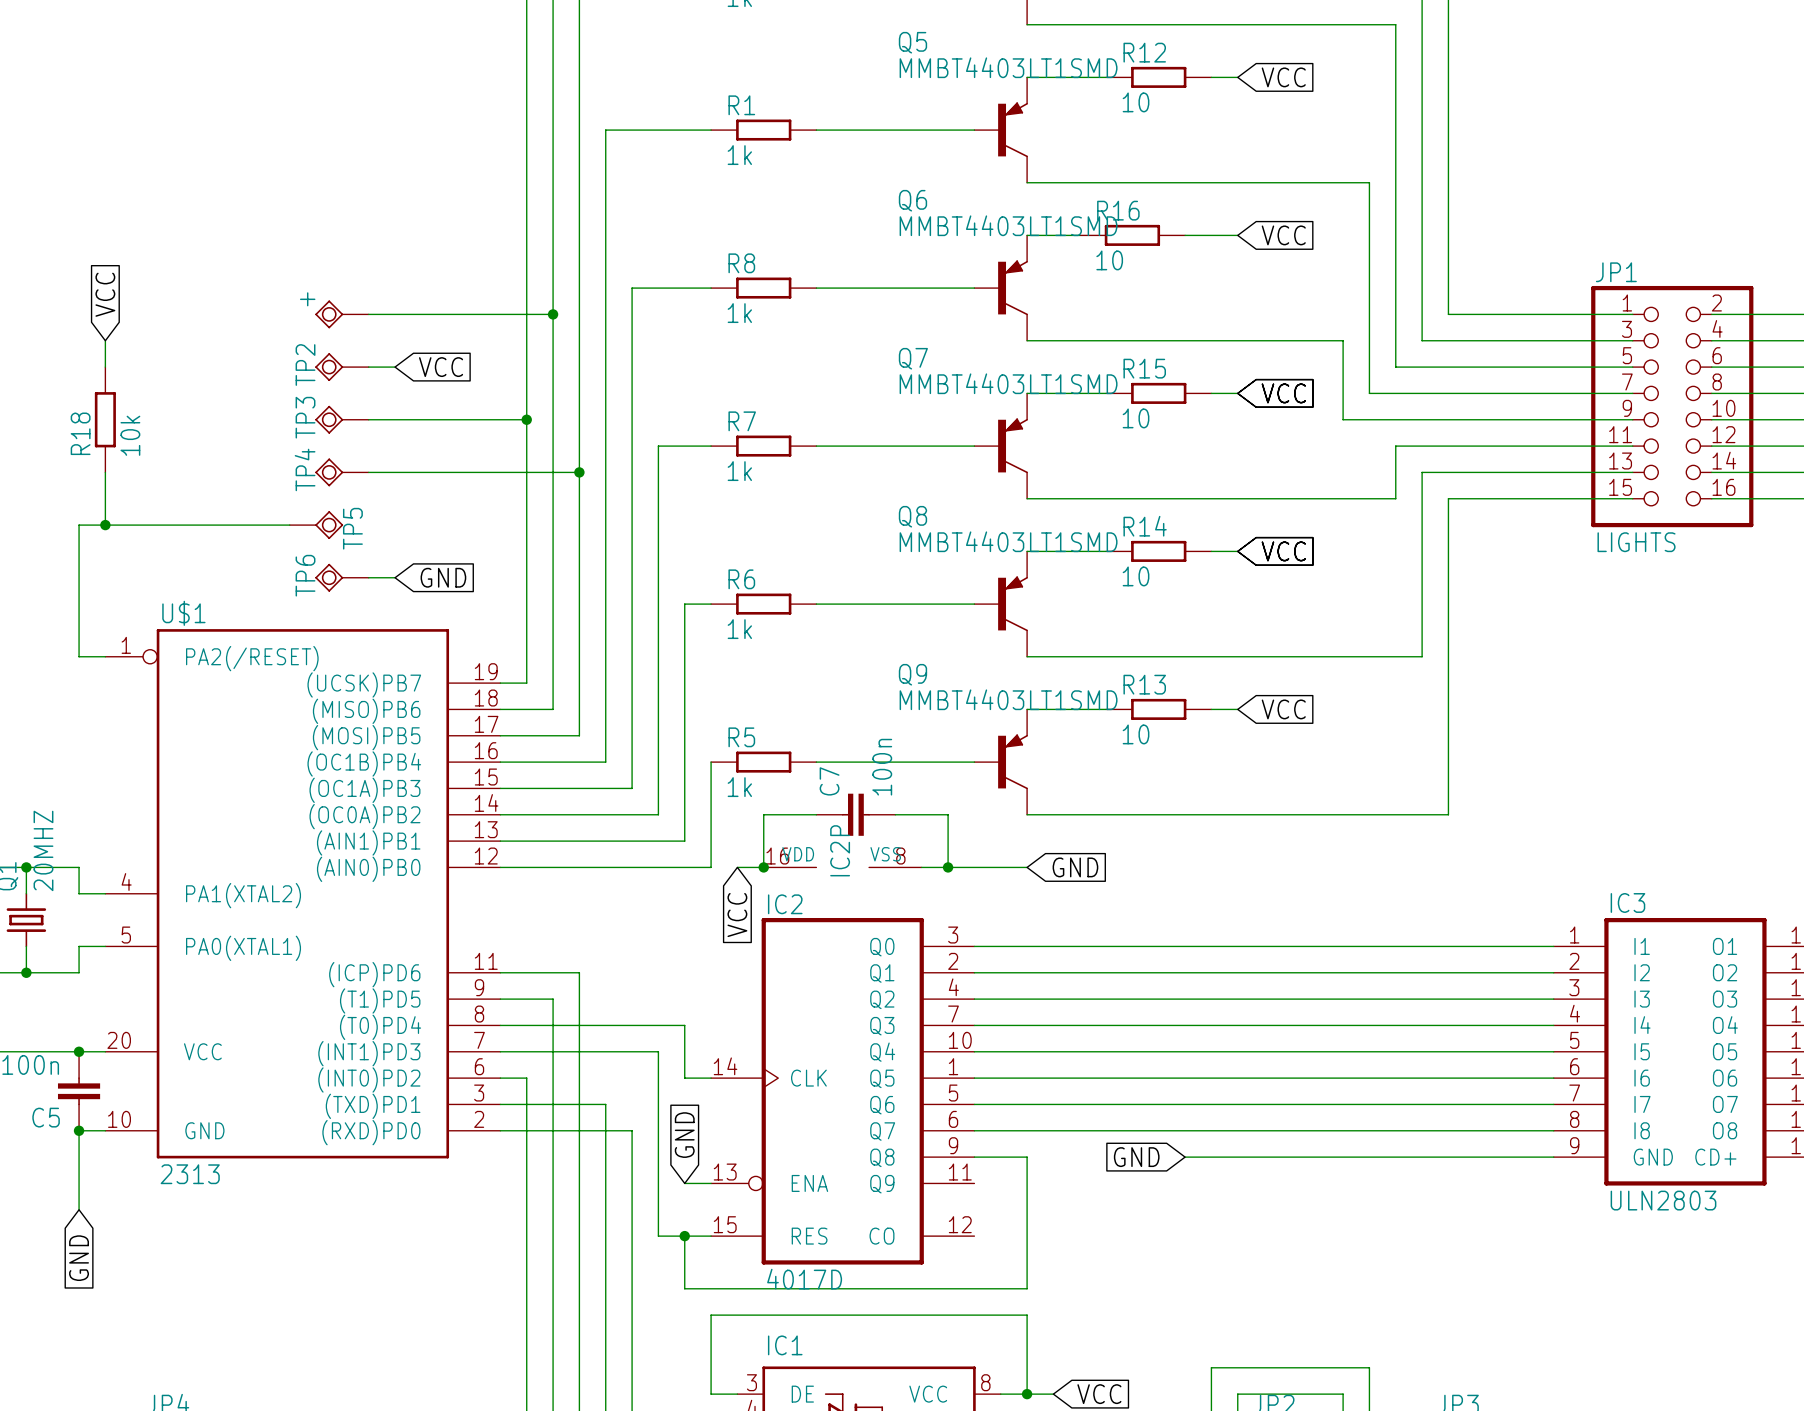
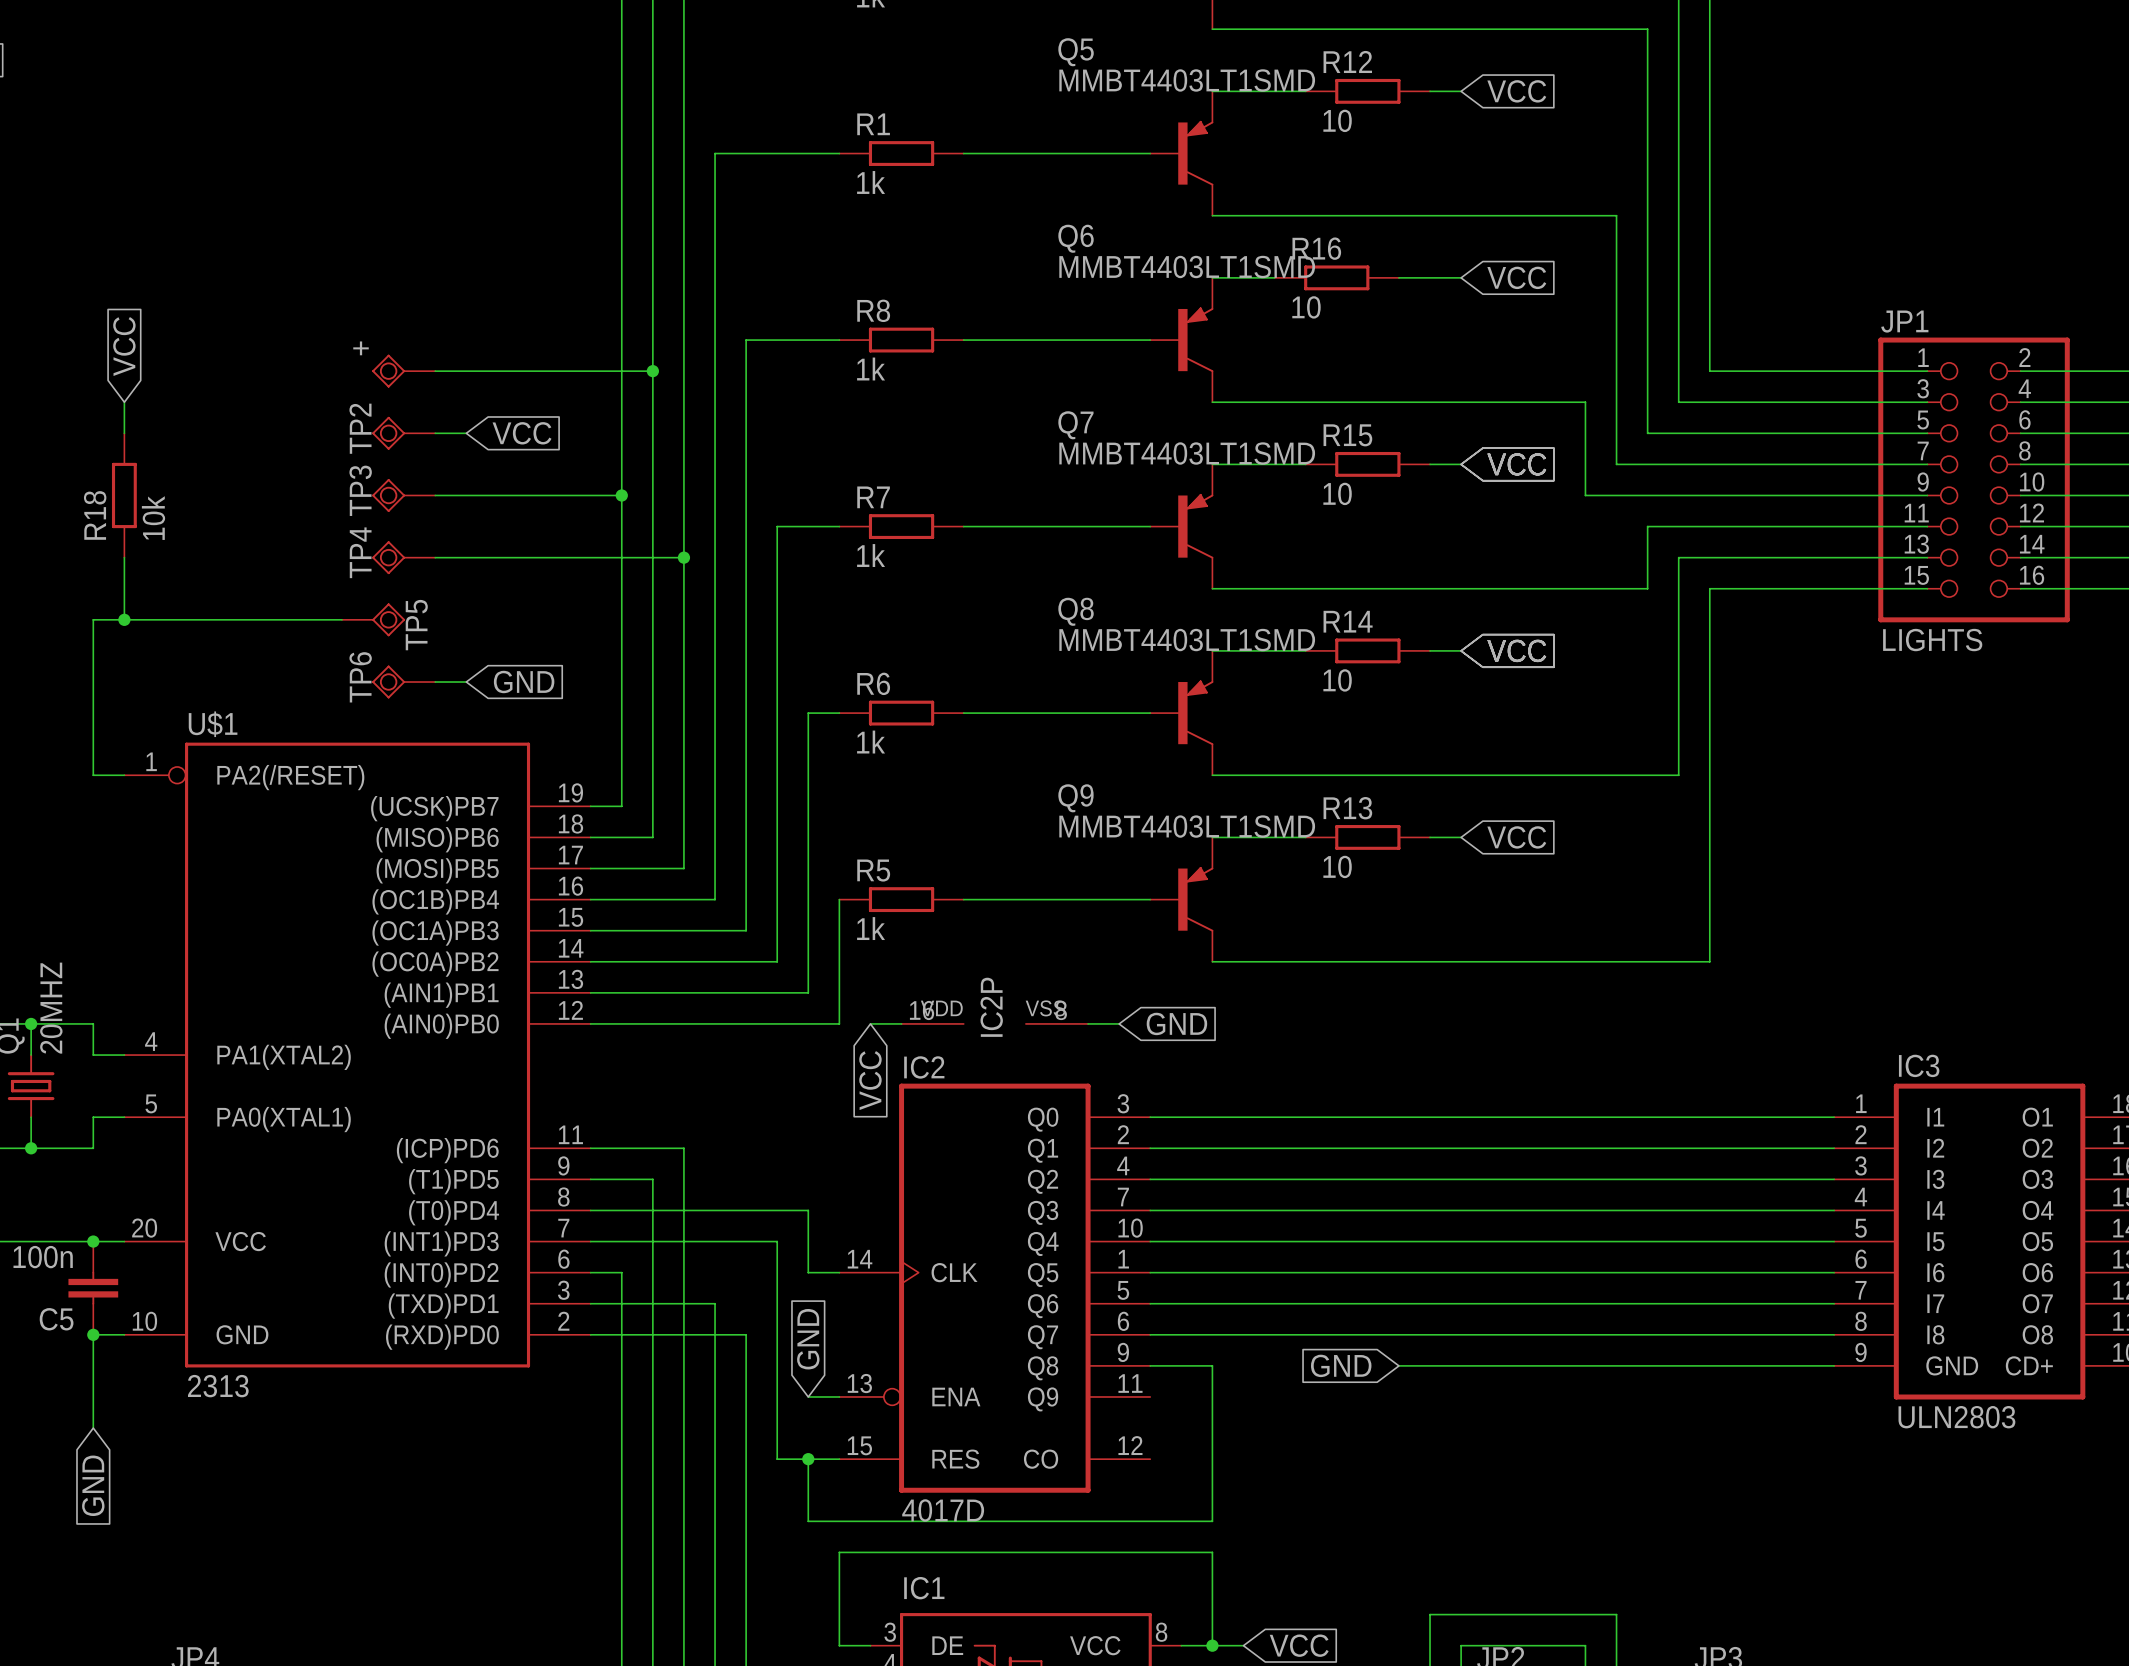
wire: (816, 814) (763, 814) (763, 867) -> none
C7: 100n (855, 814) -> none
wire: (895, 814) (948, 814) (948, 867) (1027, 867) -> none
junction: (763, 867) -> none
junction: (948, 867) -> none
global label position: GND (1075, 867) -> GND (1176, 1023)

